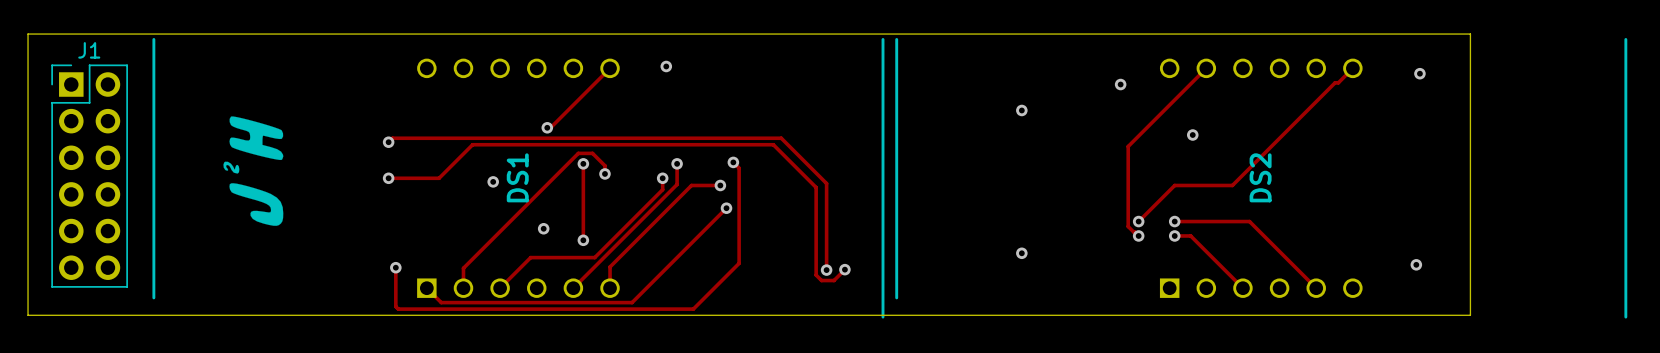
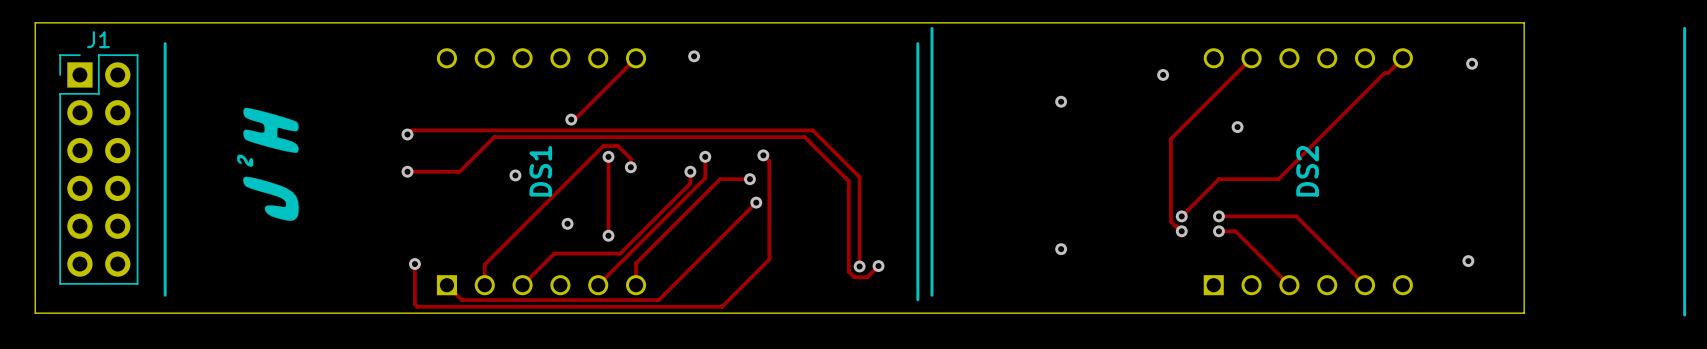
DS1 footprint: [152, 38, 885, 319] -> [163, 42, 920, 302]

